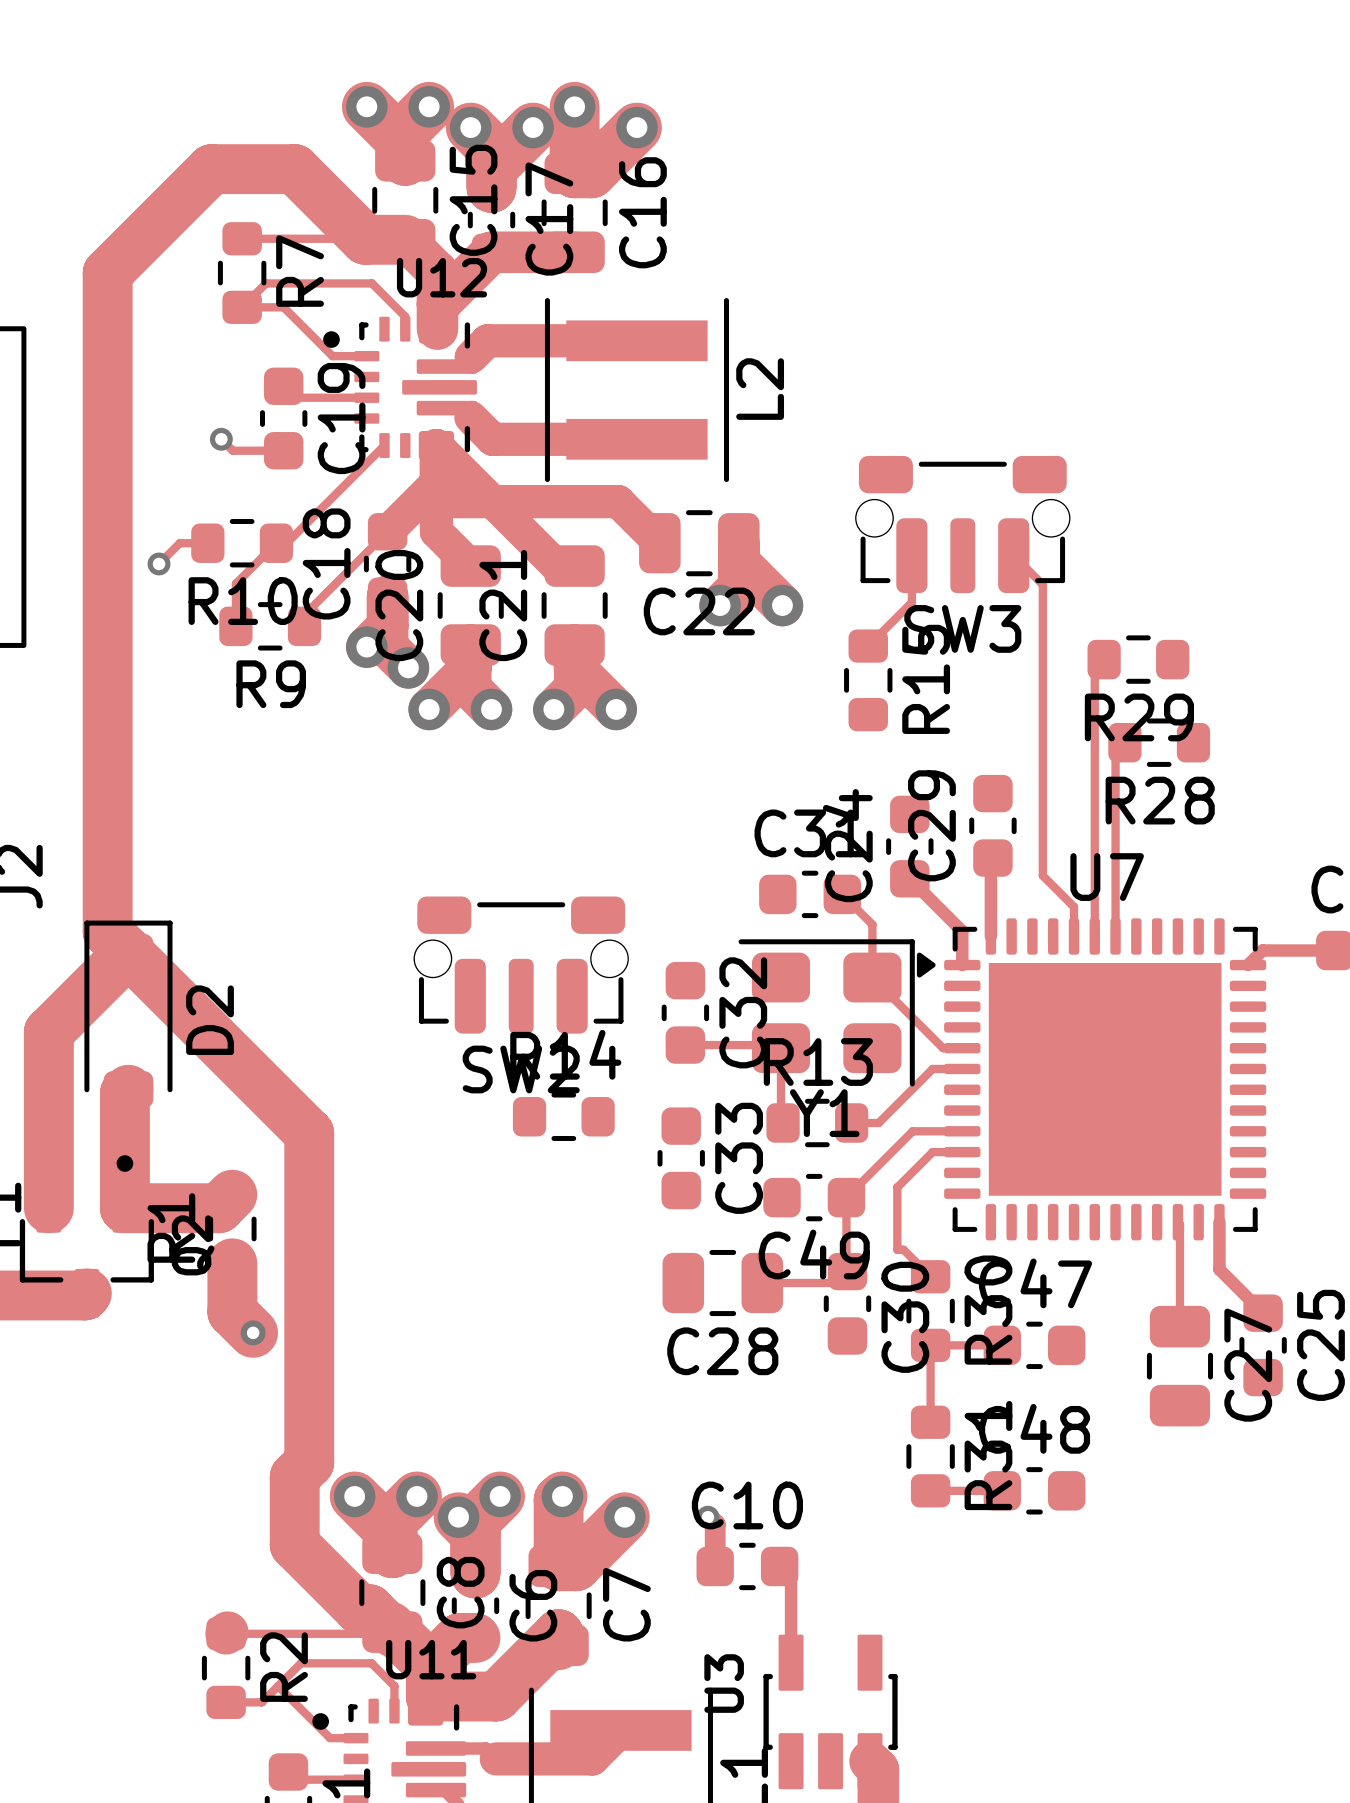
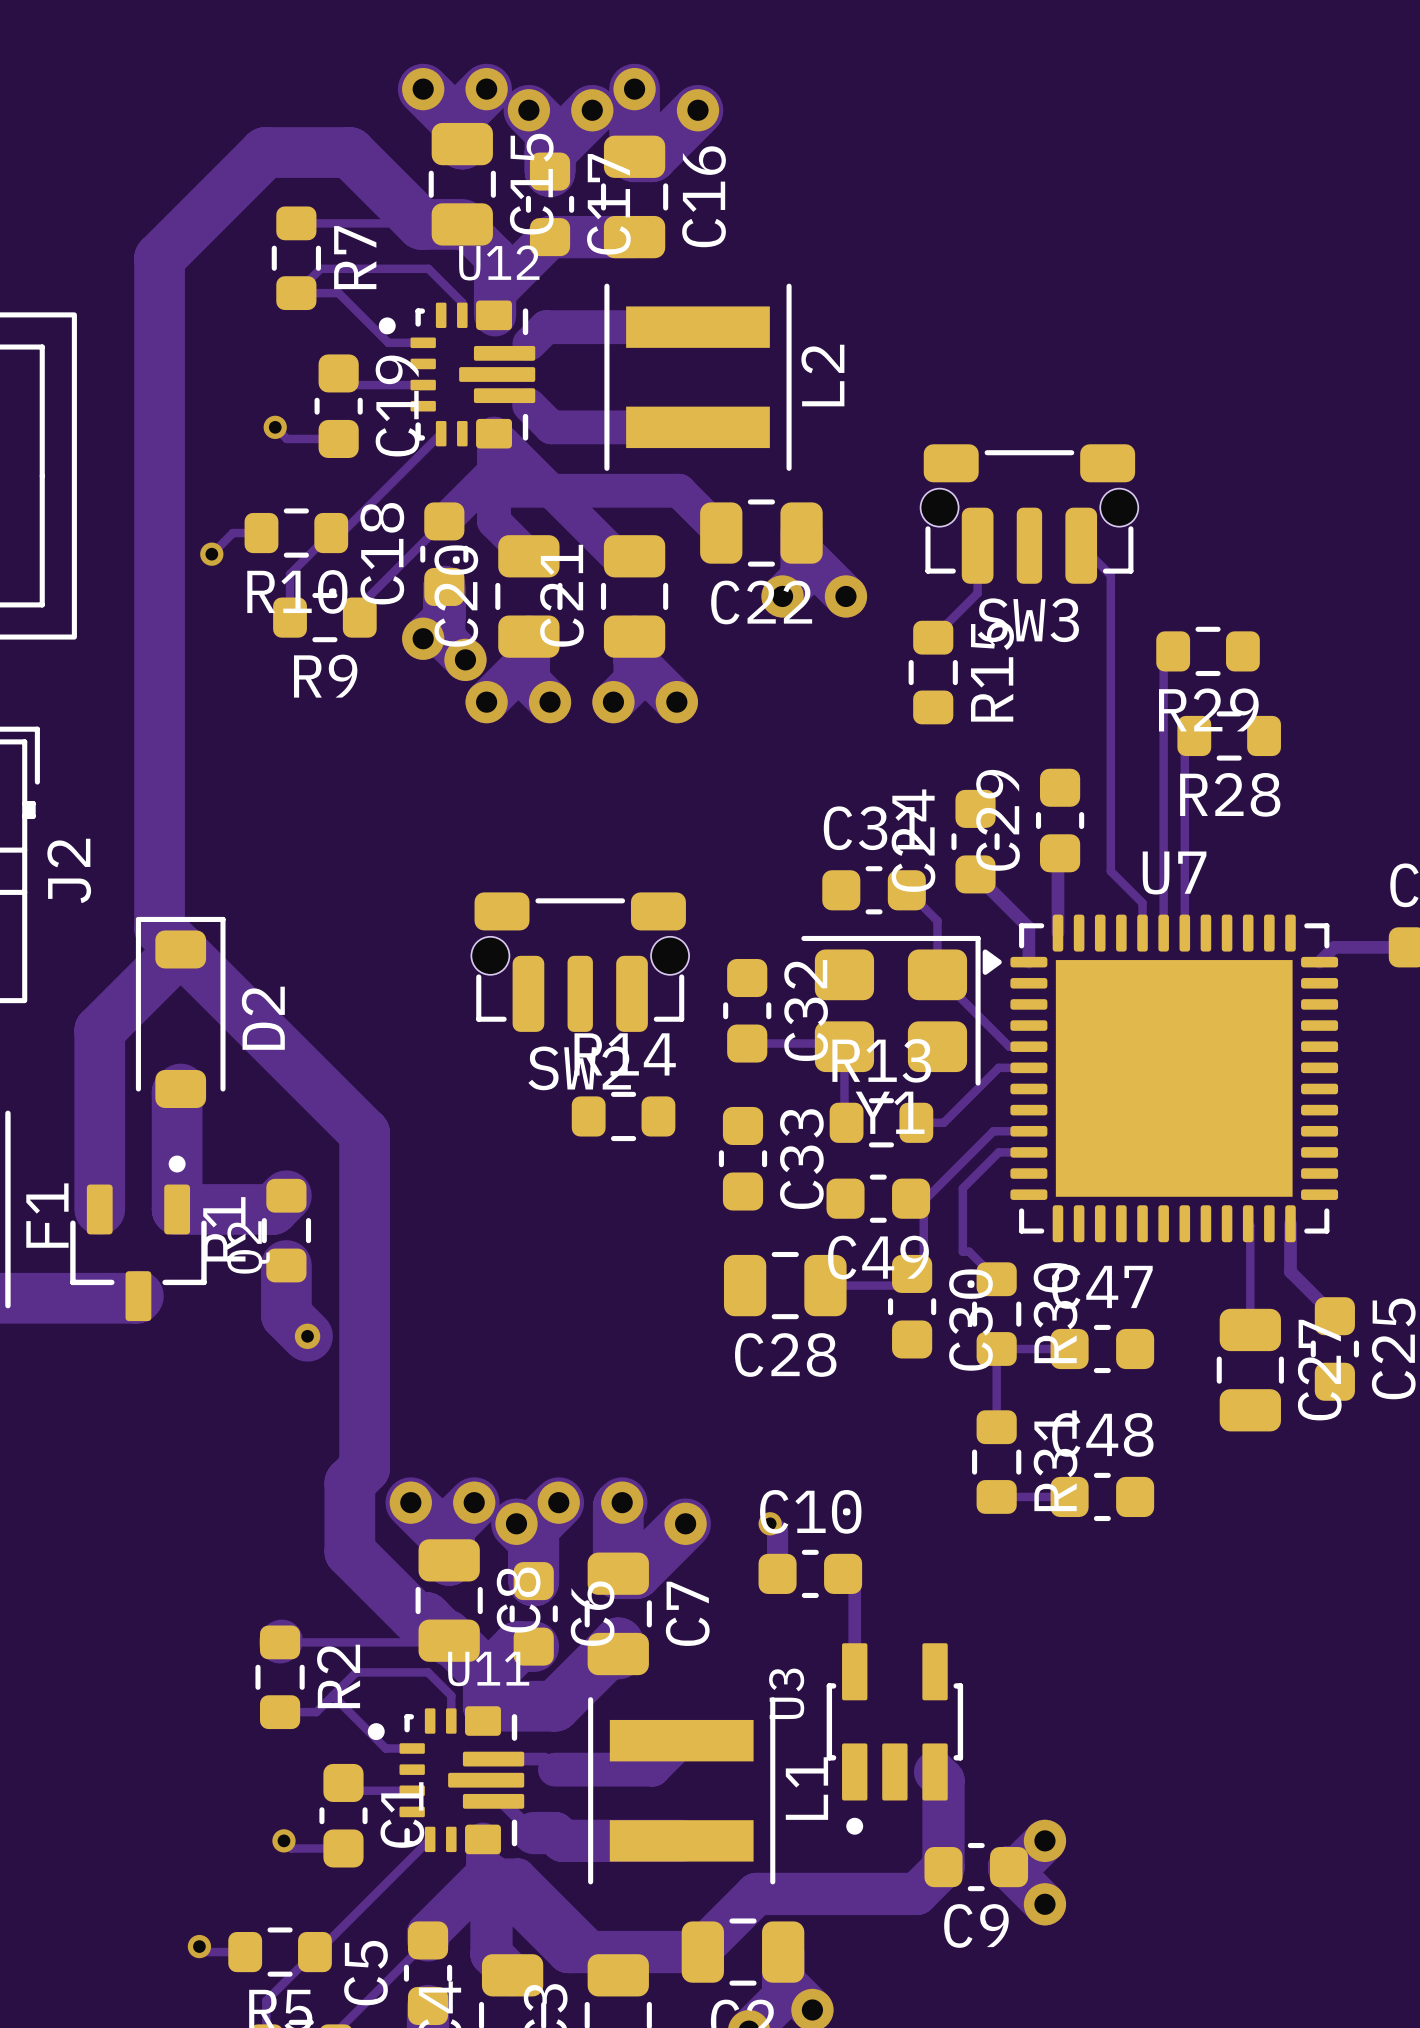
track: (927, 1131) (912, 1131) (846, 1197) (847, 1271) -> (993, 1131) (923, 1201) (923, 1262)

